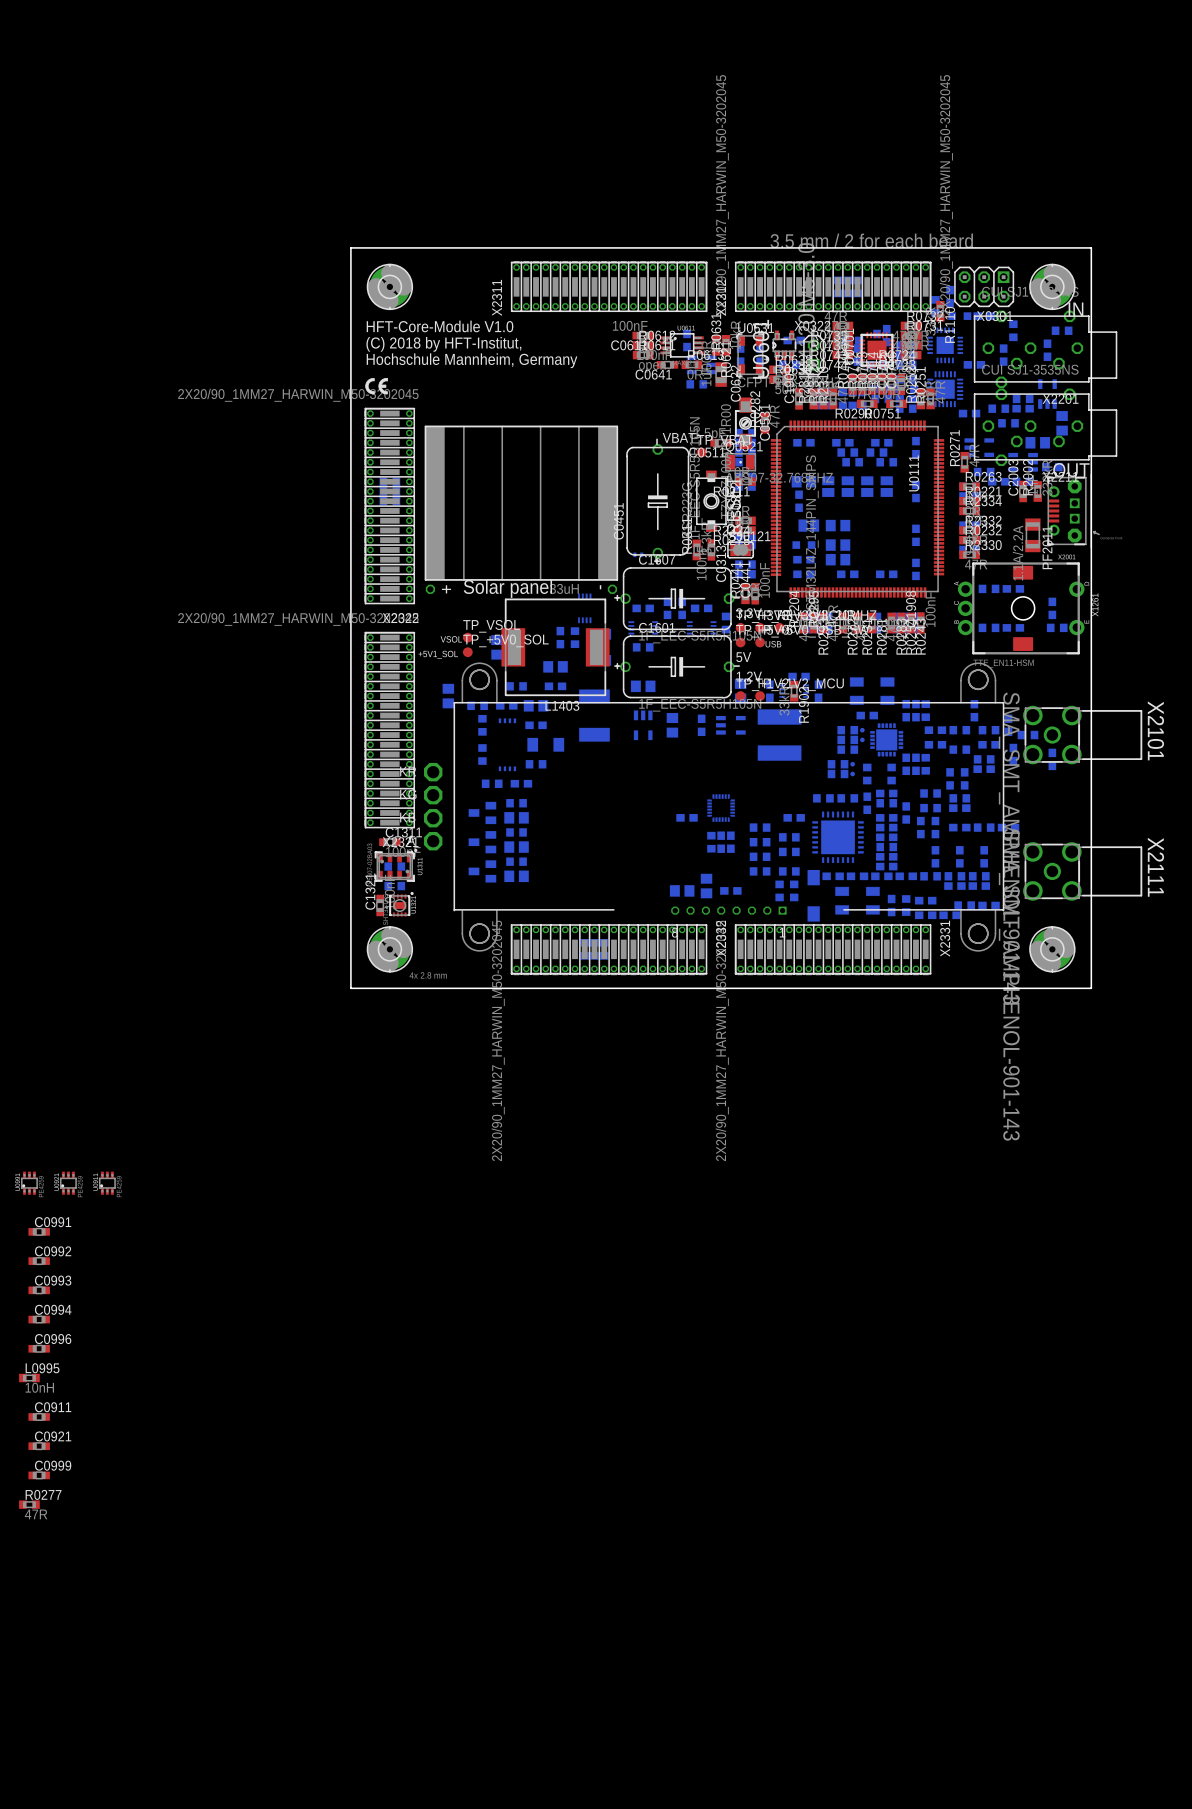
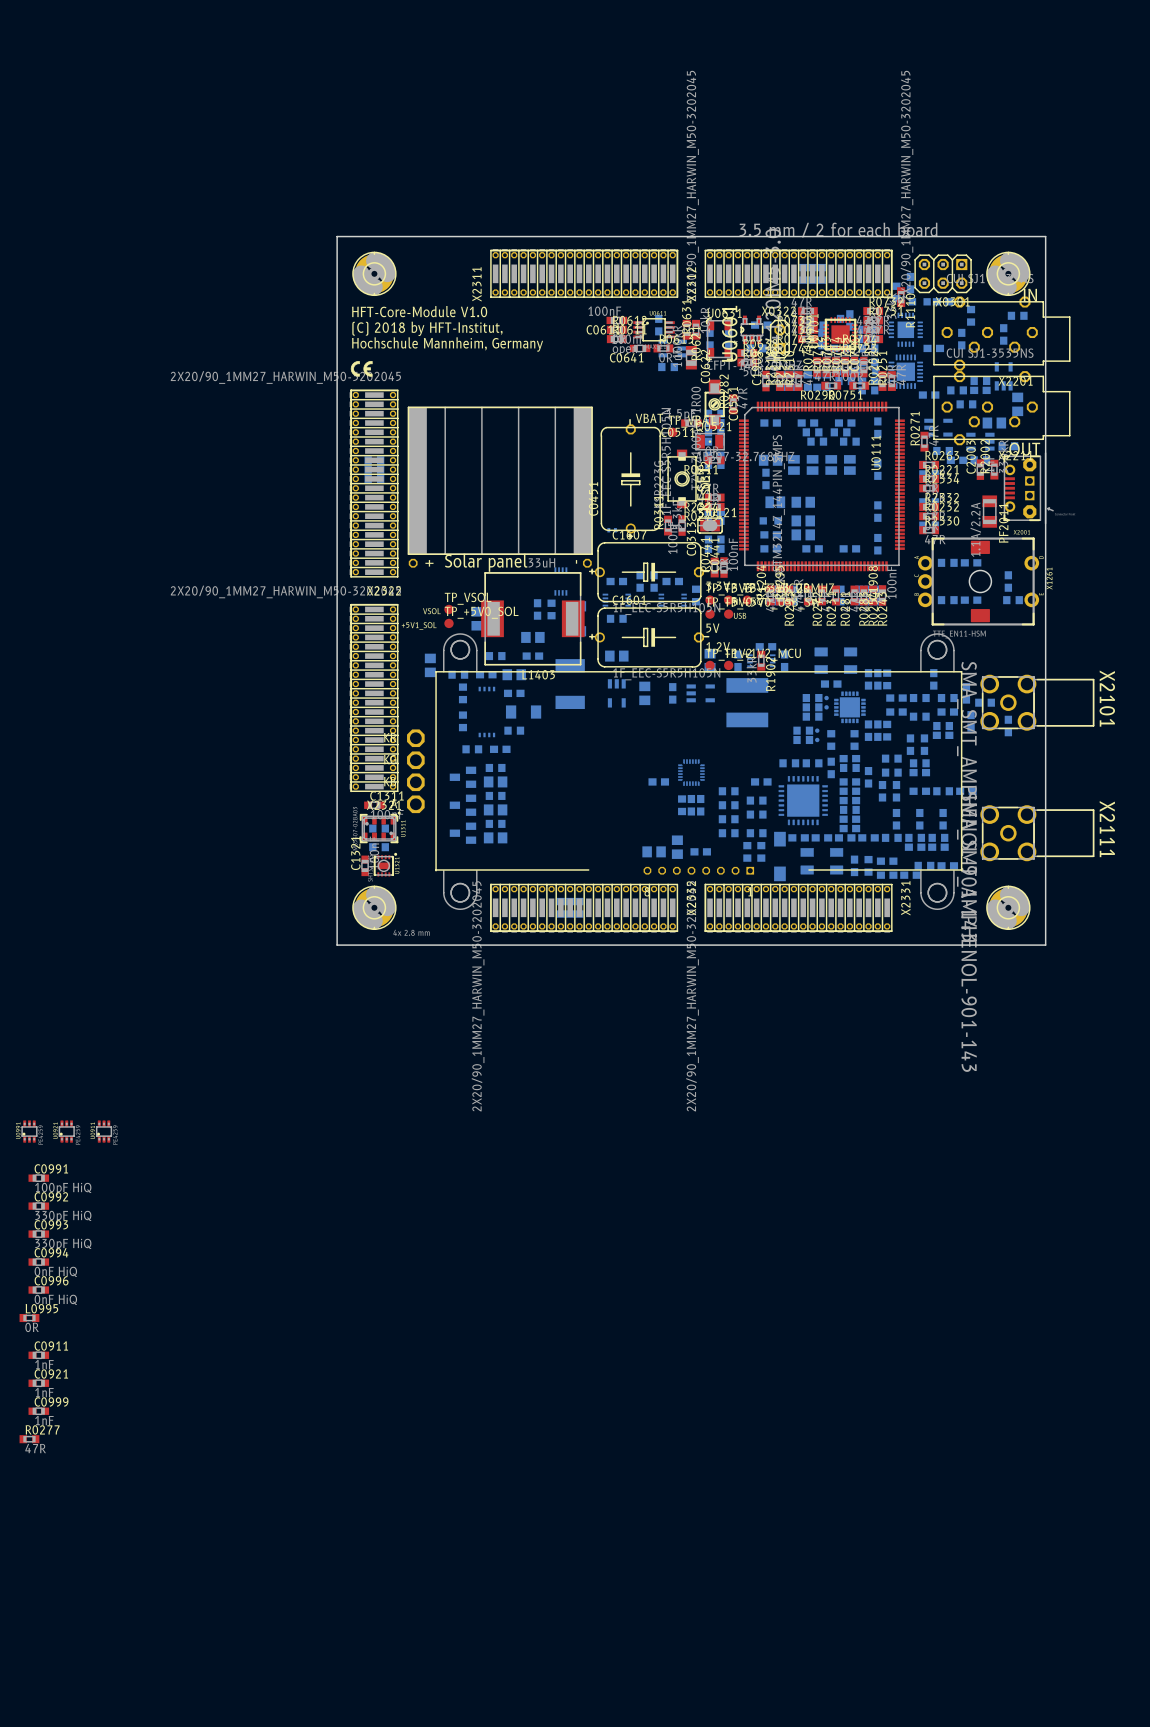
C0991 value: none -> 100pF HiQ (63, 1189)
C0992 value: none -> 330pF HiQ (63, 1216)
C0993 value: none -> 330pF HiQ (63, 1244)
C0994 value: none -> 0nF HiQ (55, 1271)
C0996 value: none -> 0nF HiQ (55, 1299)
L0995 value: 10nH (39, 1387) -> 0R (32, 1327)
C0911 value: none -> 1nF (44, 1364)
C0921 value: none -> 1nF (44, 1392)
C0999 value: none -> 1nF (44, 1420)

